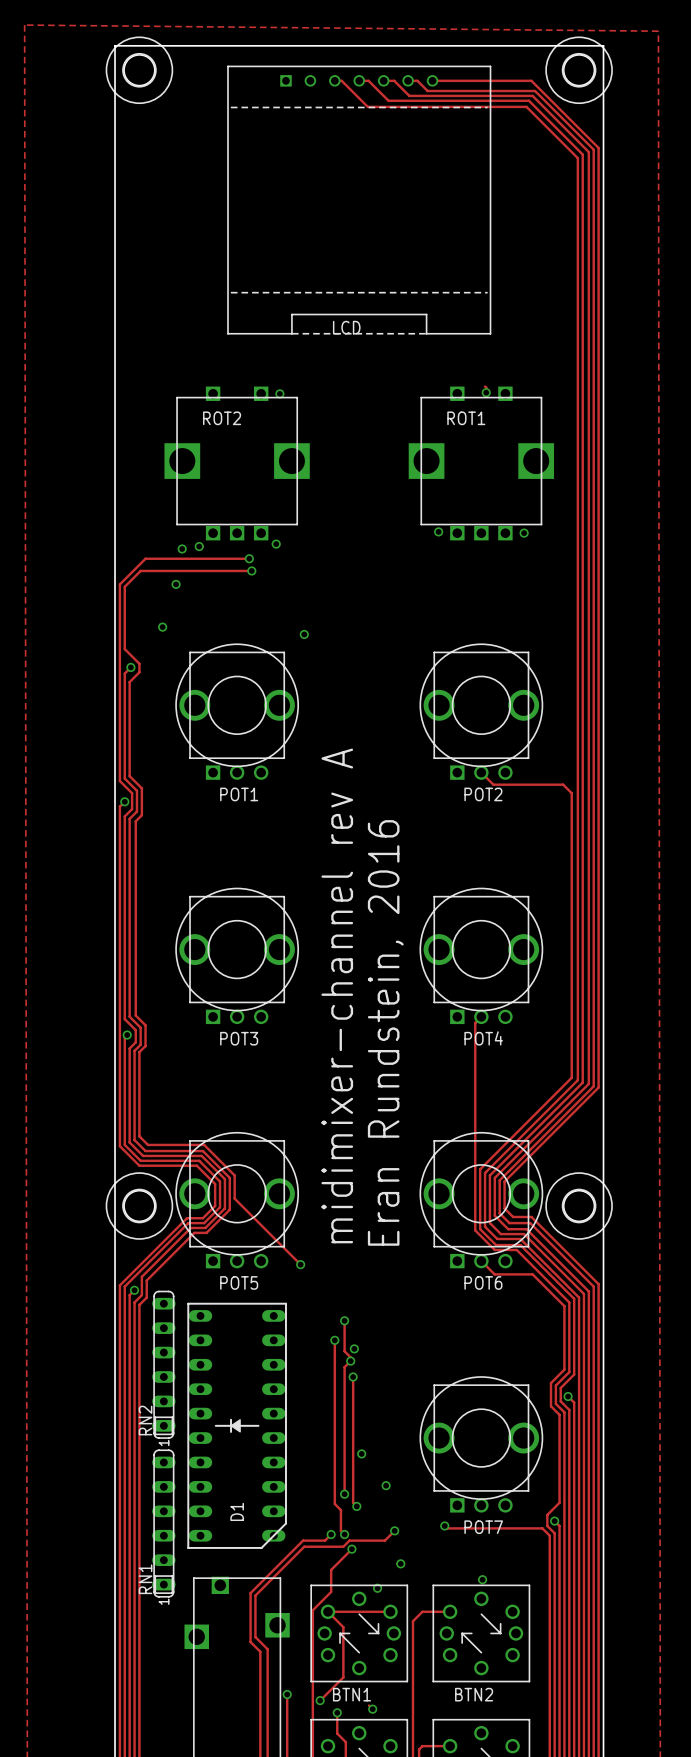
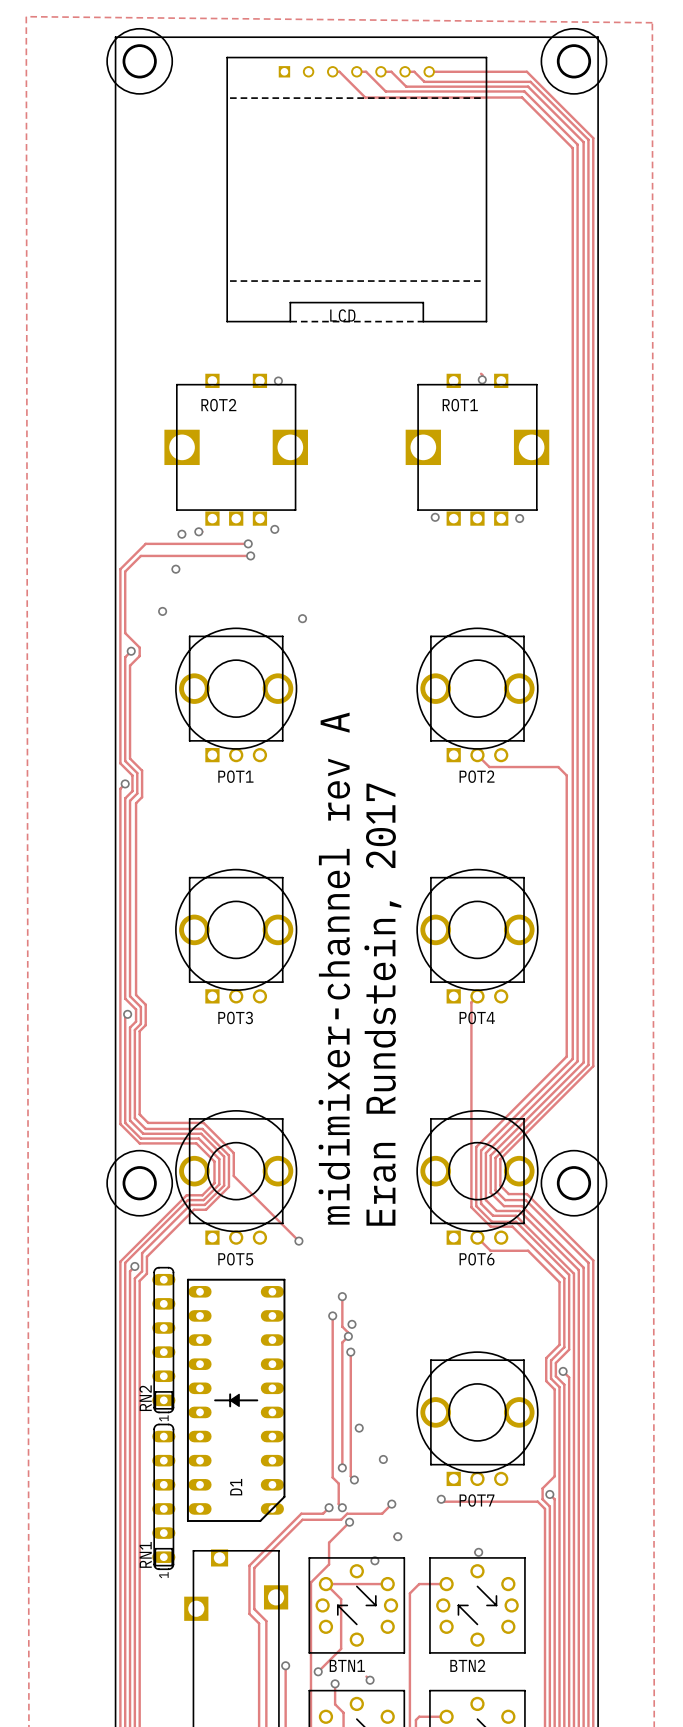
text: Eran Rundstein, 2016 (385, 1032) -> Eran Rundstein, 2017 (382, 1004)

